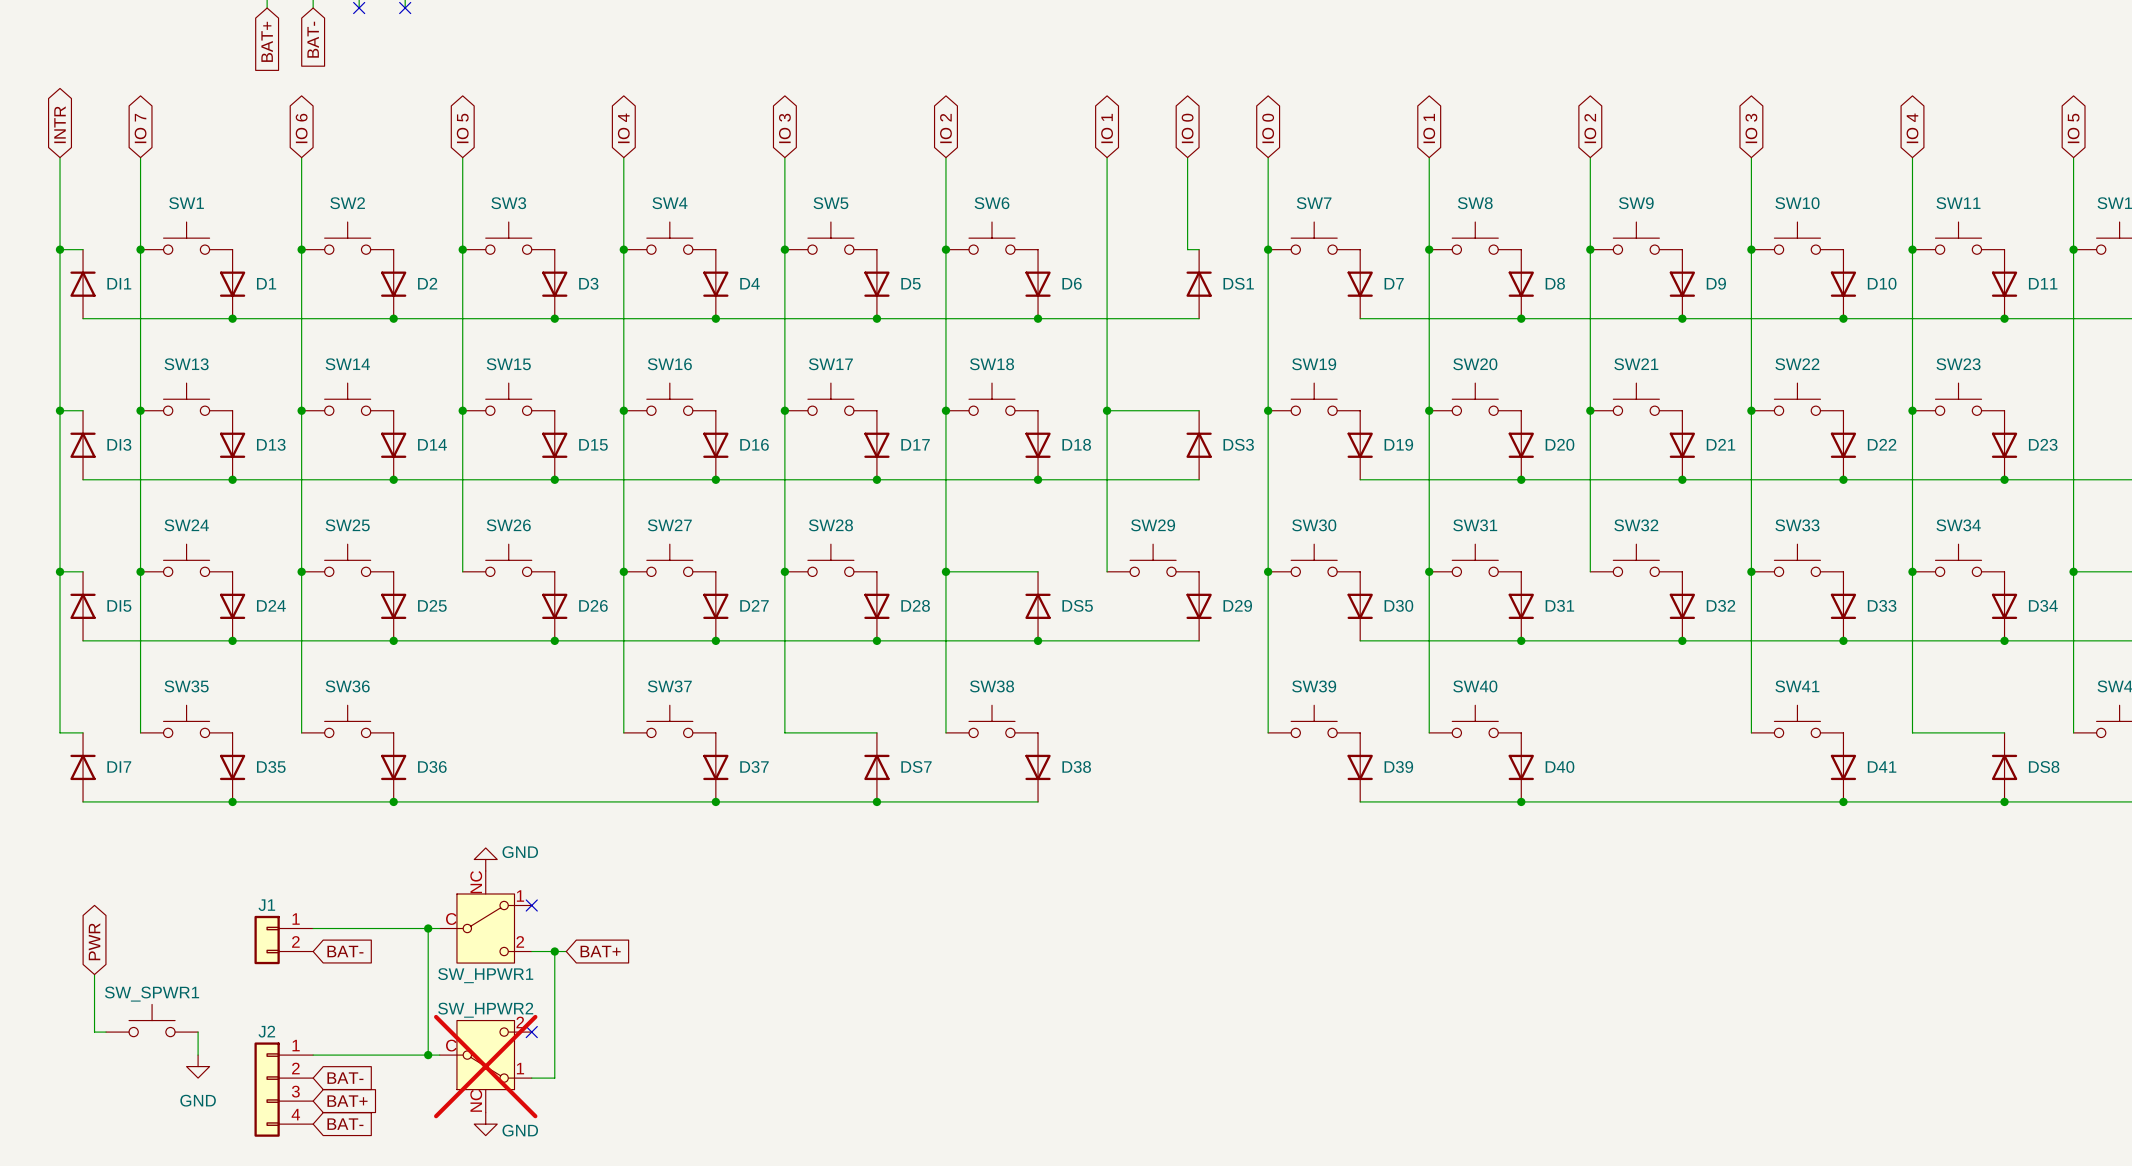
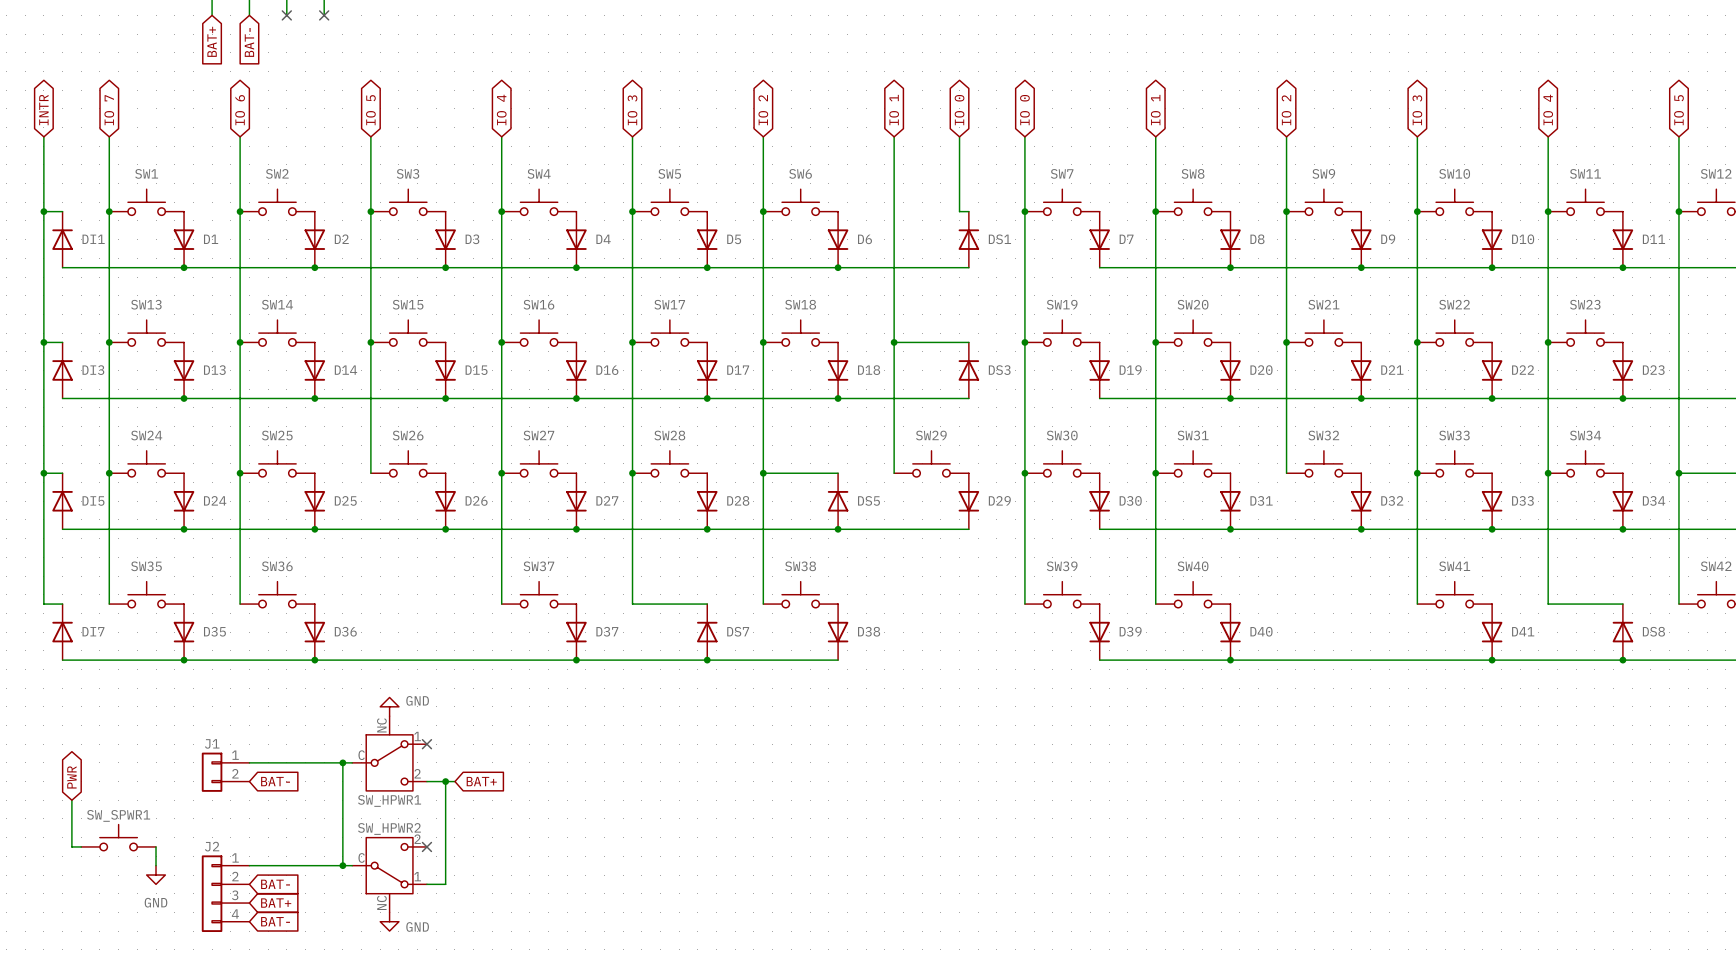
SW_HPWR2 do-not-place cross: (485, 1066) -> none

